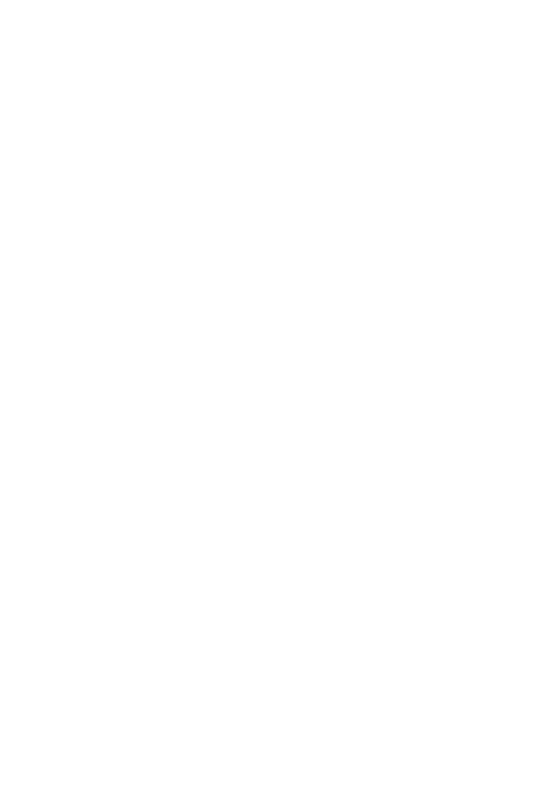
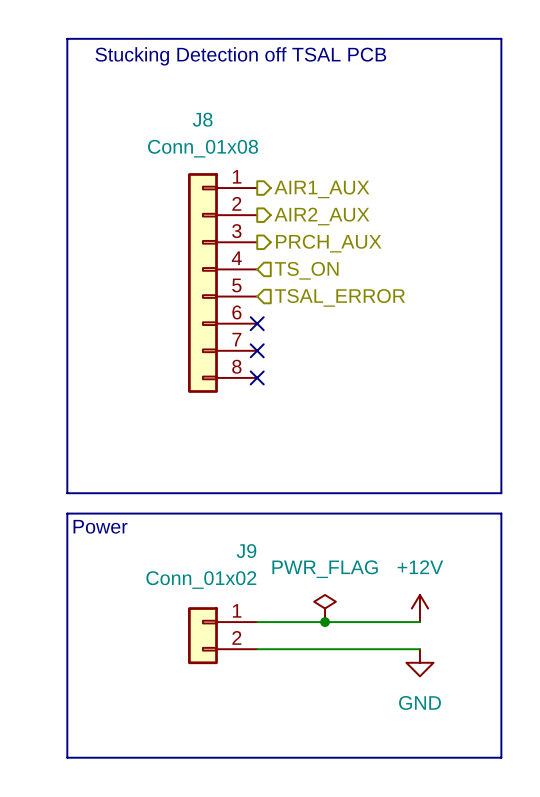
line: none -> (67, 38) (67, 493) (501, 493) (501, 38) (67, 38)
text: none -> Stucking Detection off TSAL PCB (240, 56)
hierarchical label: none -> AIR1_AUX (321, 189)
hierarchical label: none -> AIR2_AUX (321, 216)
hierarchical label: none -> PRCH_AUX (328, 243)
hierarchical label: none -> TS_ON (306, 270)
J8: none -> Conn_01x08 (222, 282)
hierarchical label: none -> TSAL_ERROR (339, 297)
no-connect mark: none -> (257, 323)
no-connect mark: none -> (257, 350)
no-connect mark: none -> (257, 377)
line: none -> (67, 513) (501, 513) (501, 757) (67, 757) (67, 513)
text: none -> Power (100, 526)
power symbol: none -> PWR_FLAG (325, 608)
power symbol: none -> +12V (419, 608)
wire: none -> (257, 622) (419, 622)
junction: none -> (325, 622)
J9: none -> Conn_01x02 (222, 635)
wire: none -> (257, 649) (419, 649)
power symbol: none -> GND (419, 662)

